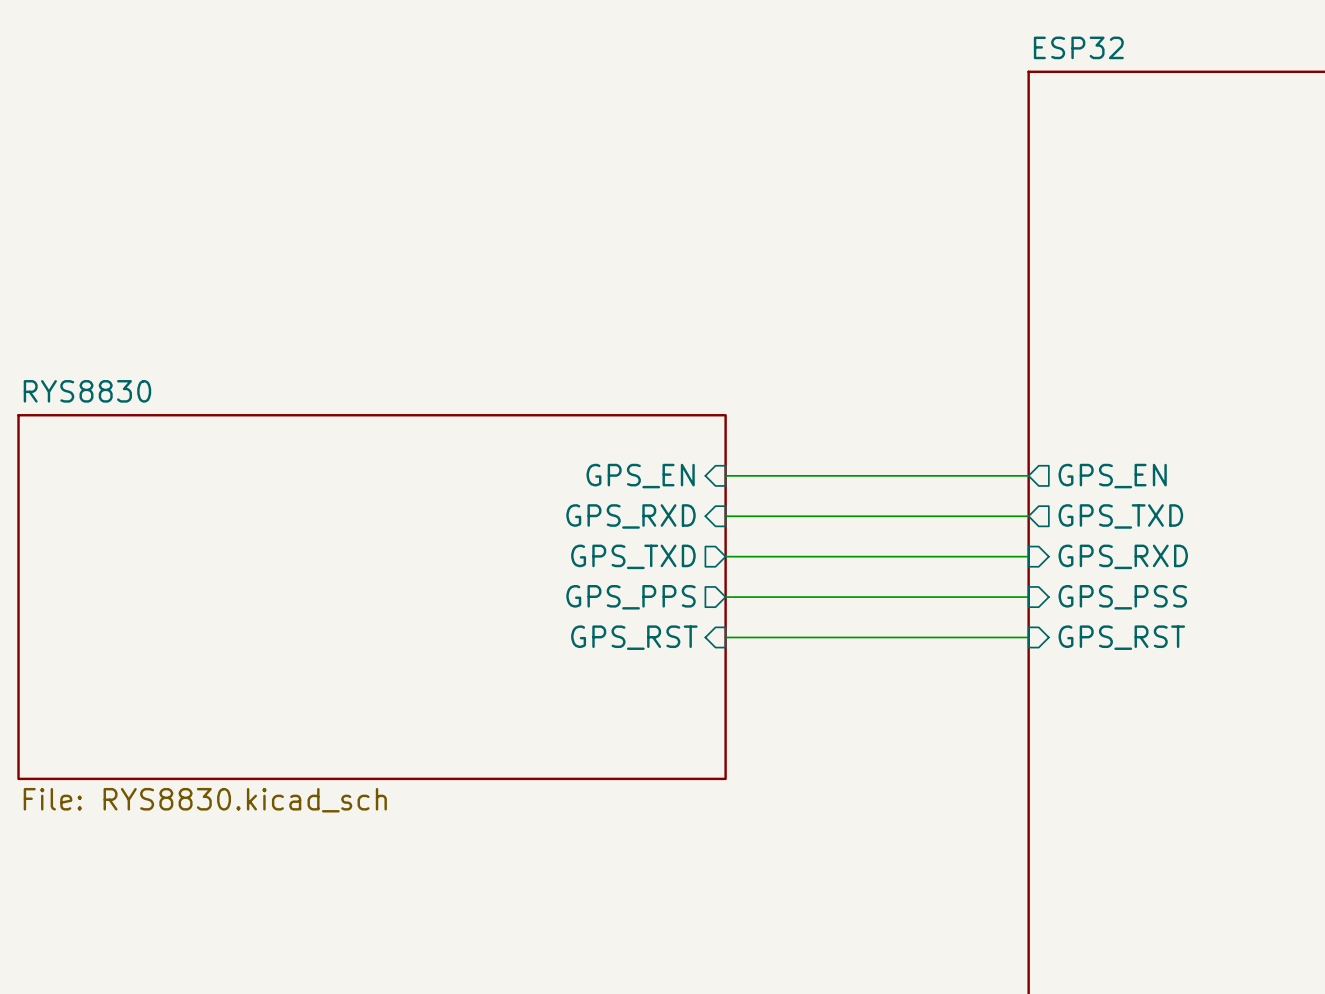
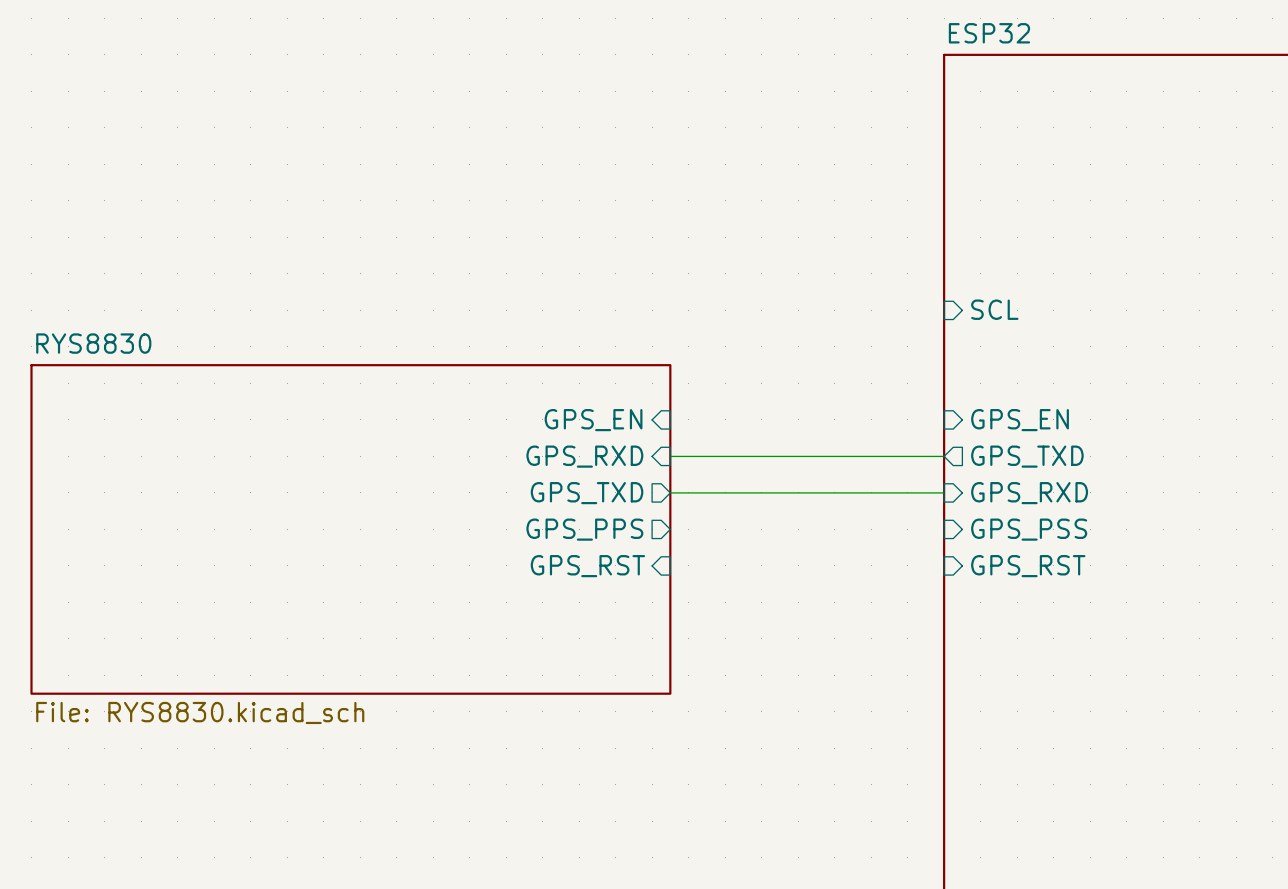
sheet pin: none -> SCL (994, 309)
wire: (725, 475) (1028, 475) -> none
sheet pin shape: output (1112, 476) -> input (1020, 420)
wire: (725, 597) (1028, 597) -> none
wire: (725, 637) (1028, 637) -> none

